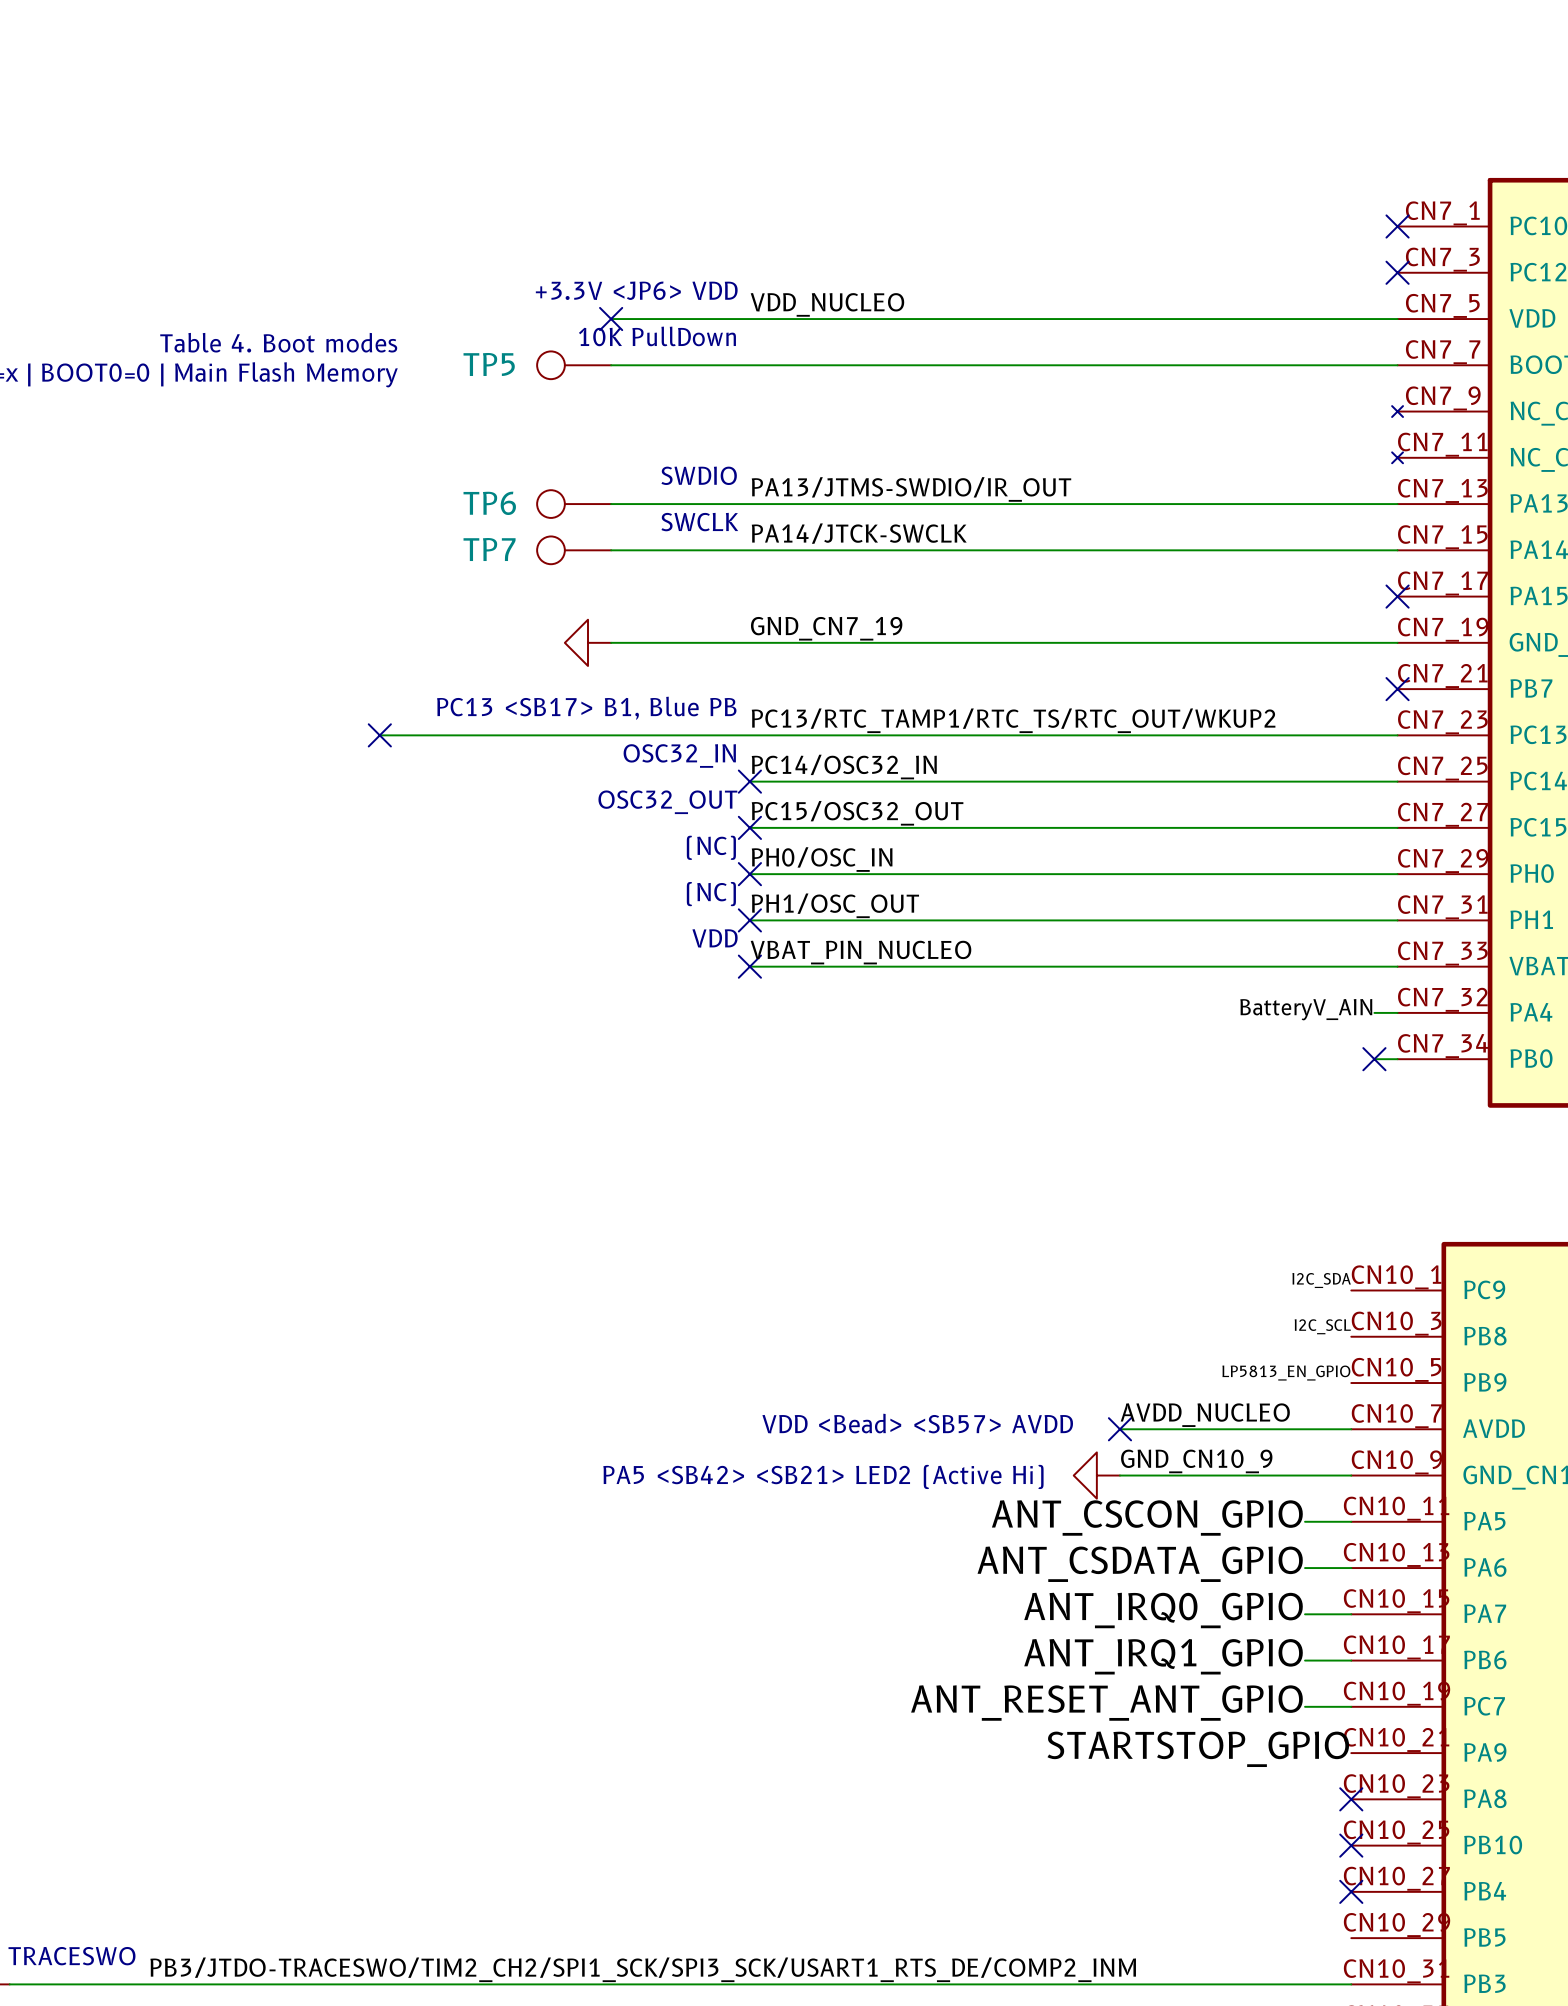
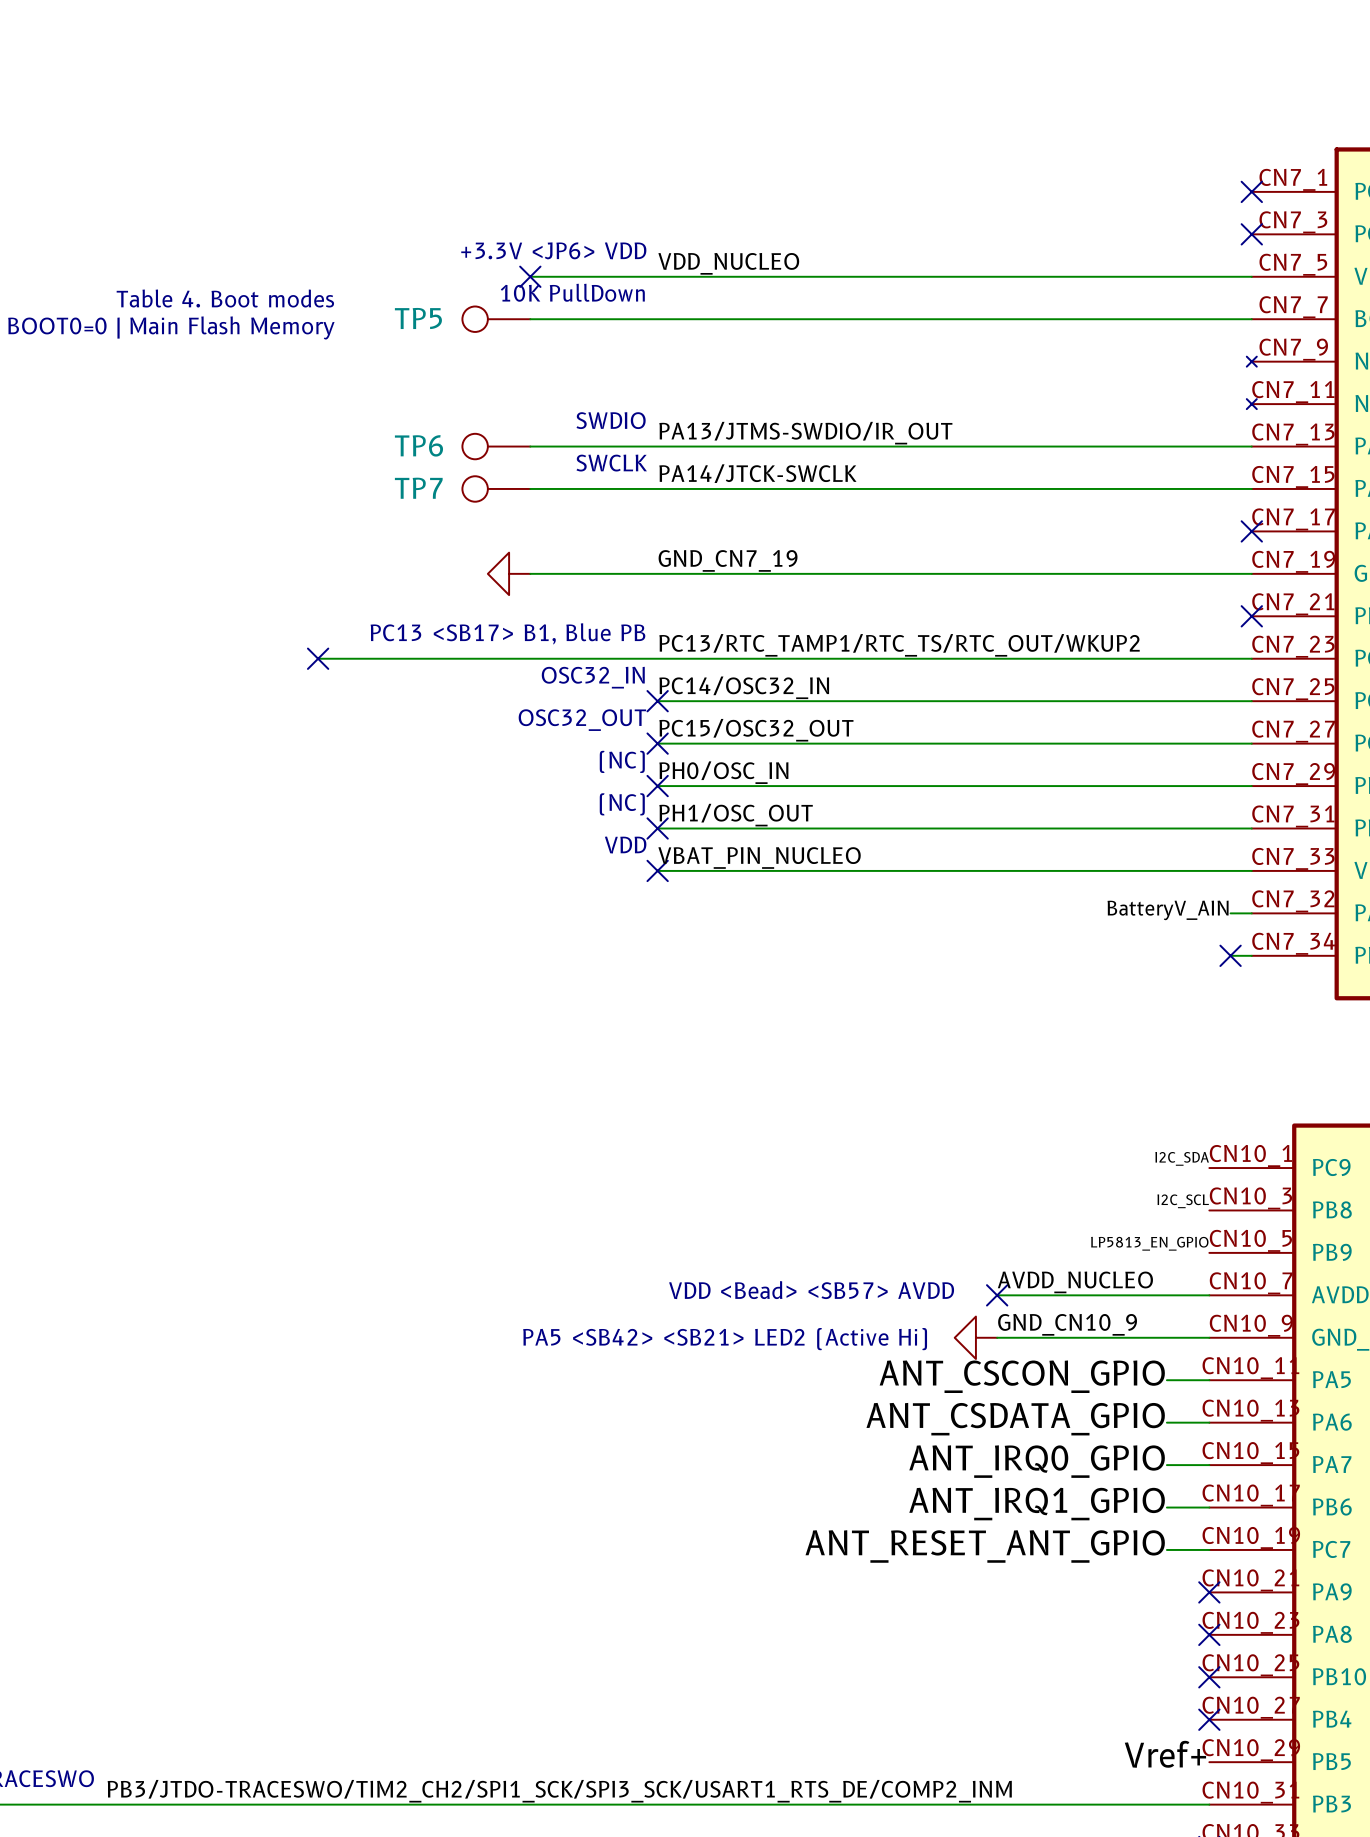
label: STARTSTOP_GPIO (1198, 1749) -> none
no-connect mark: none -> (1209, 1592)
label: none -> Vref+ (1165, 1754)

